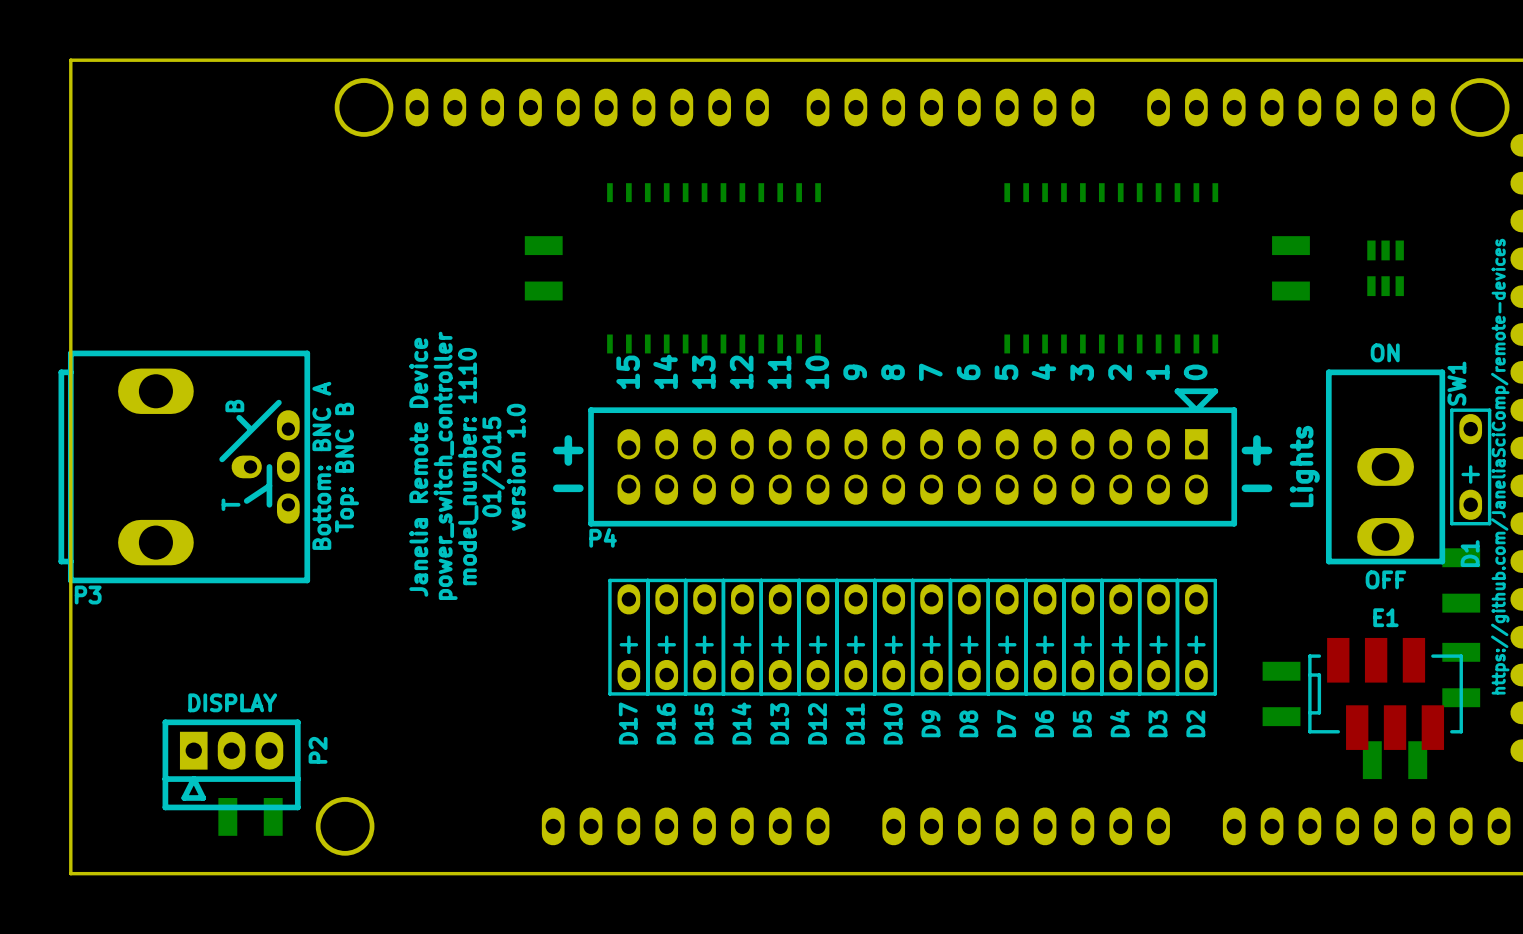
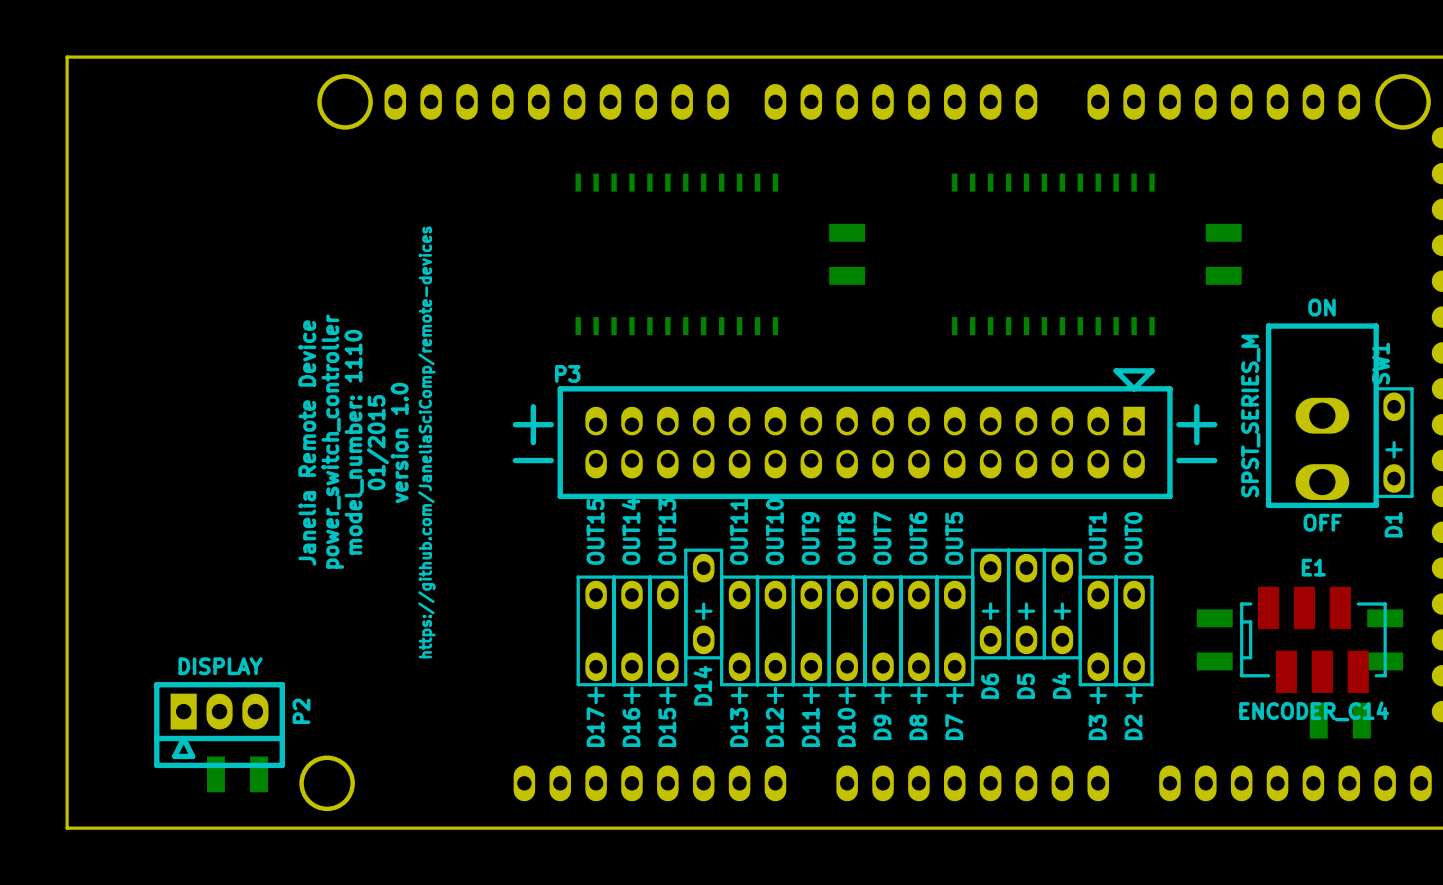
part: (543, 268) -> none
part: none -> (847, 254)
part: (1385, 268) -> none
P3 footprint: [58, 350, 311, 584] -> [557, 368, 1173, 500]
line: none -> (533, 406) (533, 442)
line: none -> (1196, 406) (1196, 442)
SW1 value: none -> SPST_SERIES_M (1250, 416)
line: none -> (515, 424) (551, 424)
line: none -> (1178, 424) (1214, 424)
P4: (912, 457) -> none
text position: power_switch_controller (445, 465) -> power_switch_controller (332, 441)
text: none -> https://github.com/JaneliaSciComp/remote-devices (426, 442)
text position: model_number: 1110 (468, 466) -> model_number: 1110 (354, 442)
text position: 01/2015 (493, 466) -> 01/2015 (377, 442)
SW1 text: Lights (1304, 466) -> none
SW1 position: (1385, 466) -> (1322, 415)
text: https://github.com/JaneliaSciComp/remote-devices (1500, 466) -> none
text position: Janelia Remote Device (418, 467) -> Janelia Remote Device (307, 442)
text position: version 1.0 (516, 467) -> version 1.0 (399, 442)
line: none -> (515, 460) (551, 460)
line: none -> (1178, 460) (1214, 460)
text: none -> OUT15 (595, 531)
text: none -> OUT14 (631, 531)
text: none -> OUT13 (667, 531)
text: none -> OUT11 (739, 531)
text: none -> OUT10 (774, 531)
text: none -> OUT7 (882, 538)
text: none -> OUT9 (810, 538)
text: none -> OUT8 (846, 538)
text: none -> OUT6 (918, 538)
text: none -> OUT5 (954, 538)
text: none -> OUT1 (1097, 538)
text: none -> OUT0 (1133, 538)
D17 footprint: [608, 578, 650, 696] -> [576, 575, 616, 705]
D16 footprint: [646, 578, 688, 696] -> [612, 575, 652, 705]
D15 footprint: [683, 578, 726, 696] -> [648, 575, 688, 705]
D13 footprint: [759, 578, 801, 696] -> [720, 575, 760, 705]
D12 footprint: [797, 578, 839, 696] -> [755, 575, 795, 705]
D11 footprint: [835, 578, 877, 696] -> [791, 575, 831, 705]
D10 footprint: [873, 578, 915, 696] -> [827, 575, 867, 705]
D9 footprint: [910, 578, 953, 696] -> [863, 575, 903, 705]
D8 footprint: [948, 578, 991, 696] -> [899, 575, 939, 705]
D7 footprint: [986, 578, 1028, 696] -> [935, 575, 975, 705]
D3 footprint: [1137, 578, 1180, 696] -> [1078, 575, 1118, 705]
D2 footprint: [1175, 578, 1218, 696] -> [1114, 575, 1154, 705]
part: (1461, 580) -> none
P3 name position: P3 (88, 595) -> P3 (567, 373)
part position: (1281, 693) -> (1214, 639)
E1 position: (1385, 693) -> (1313, 639)
E1 value: none -> ENCODER_C14 (1314, 711)
part position: (1395, 760) -> (1340, 720)

